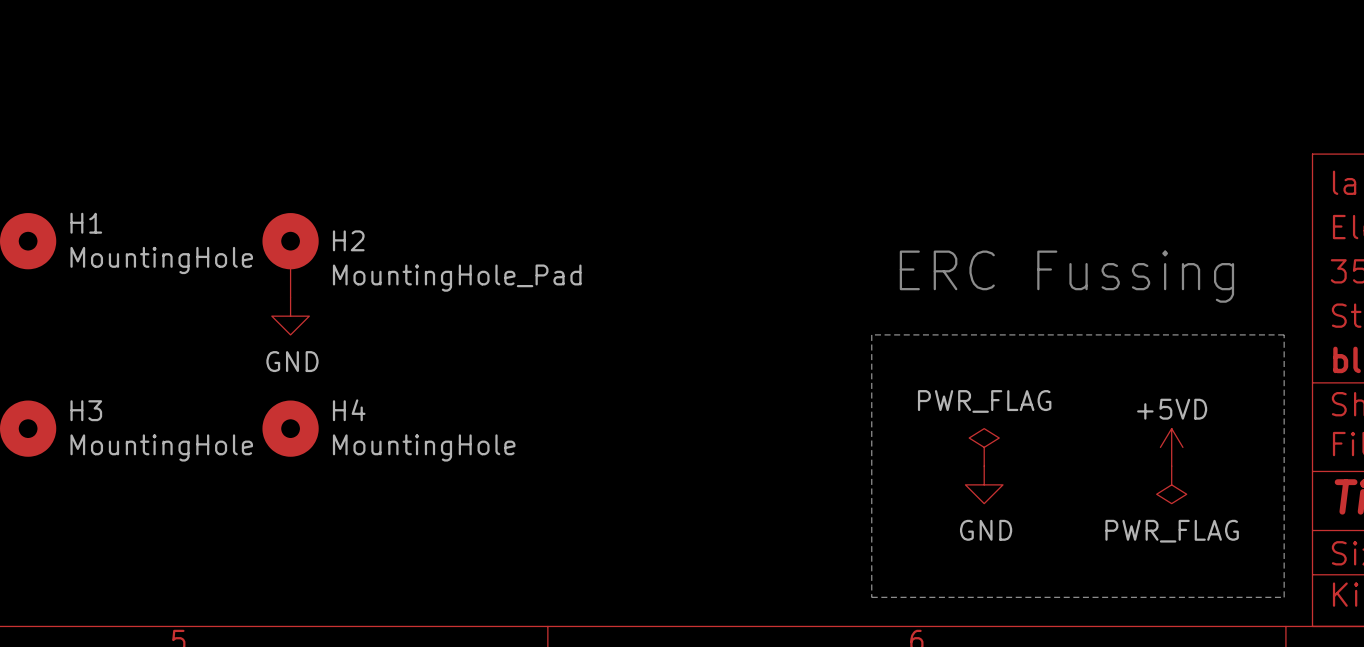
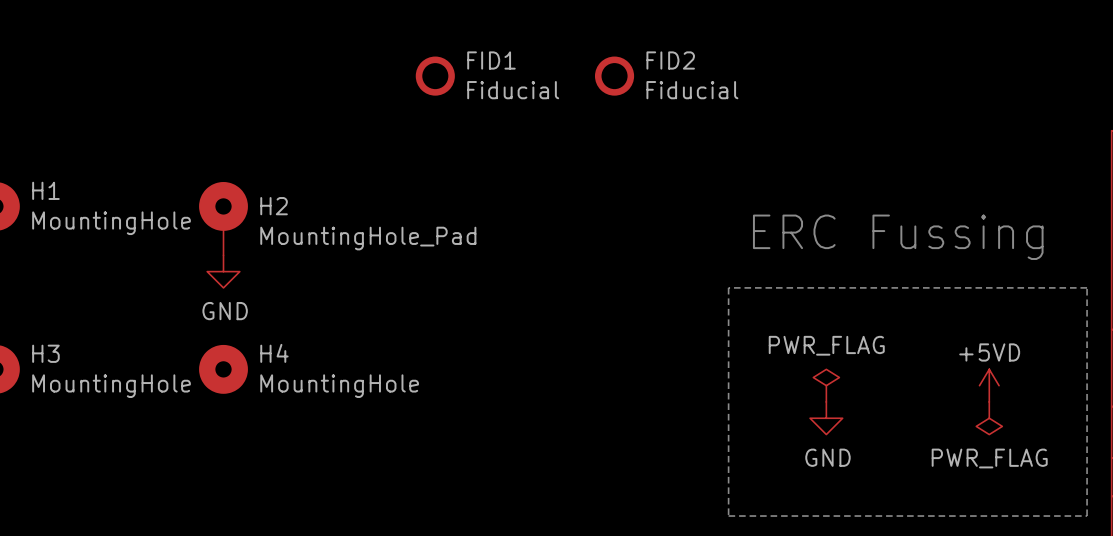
FID1: none -> Fiducial (435, 76)
FID2: none -> Fiducial (614, 76)

